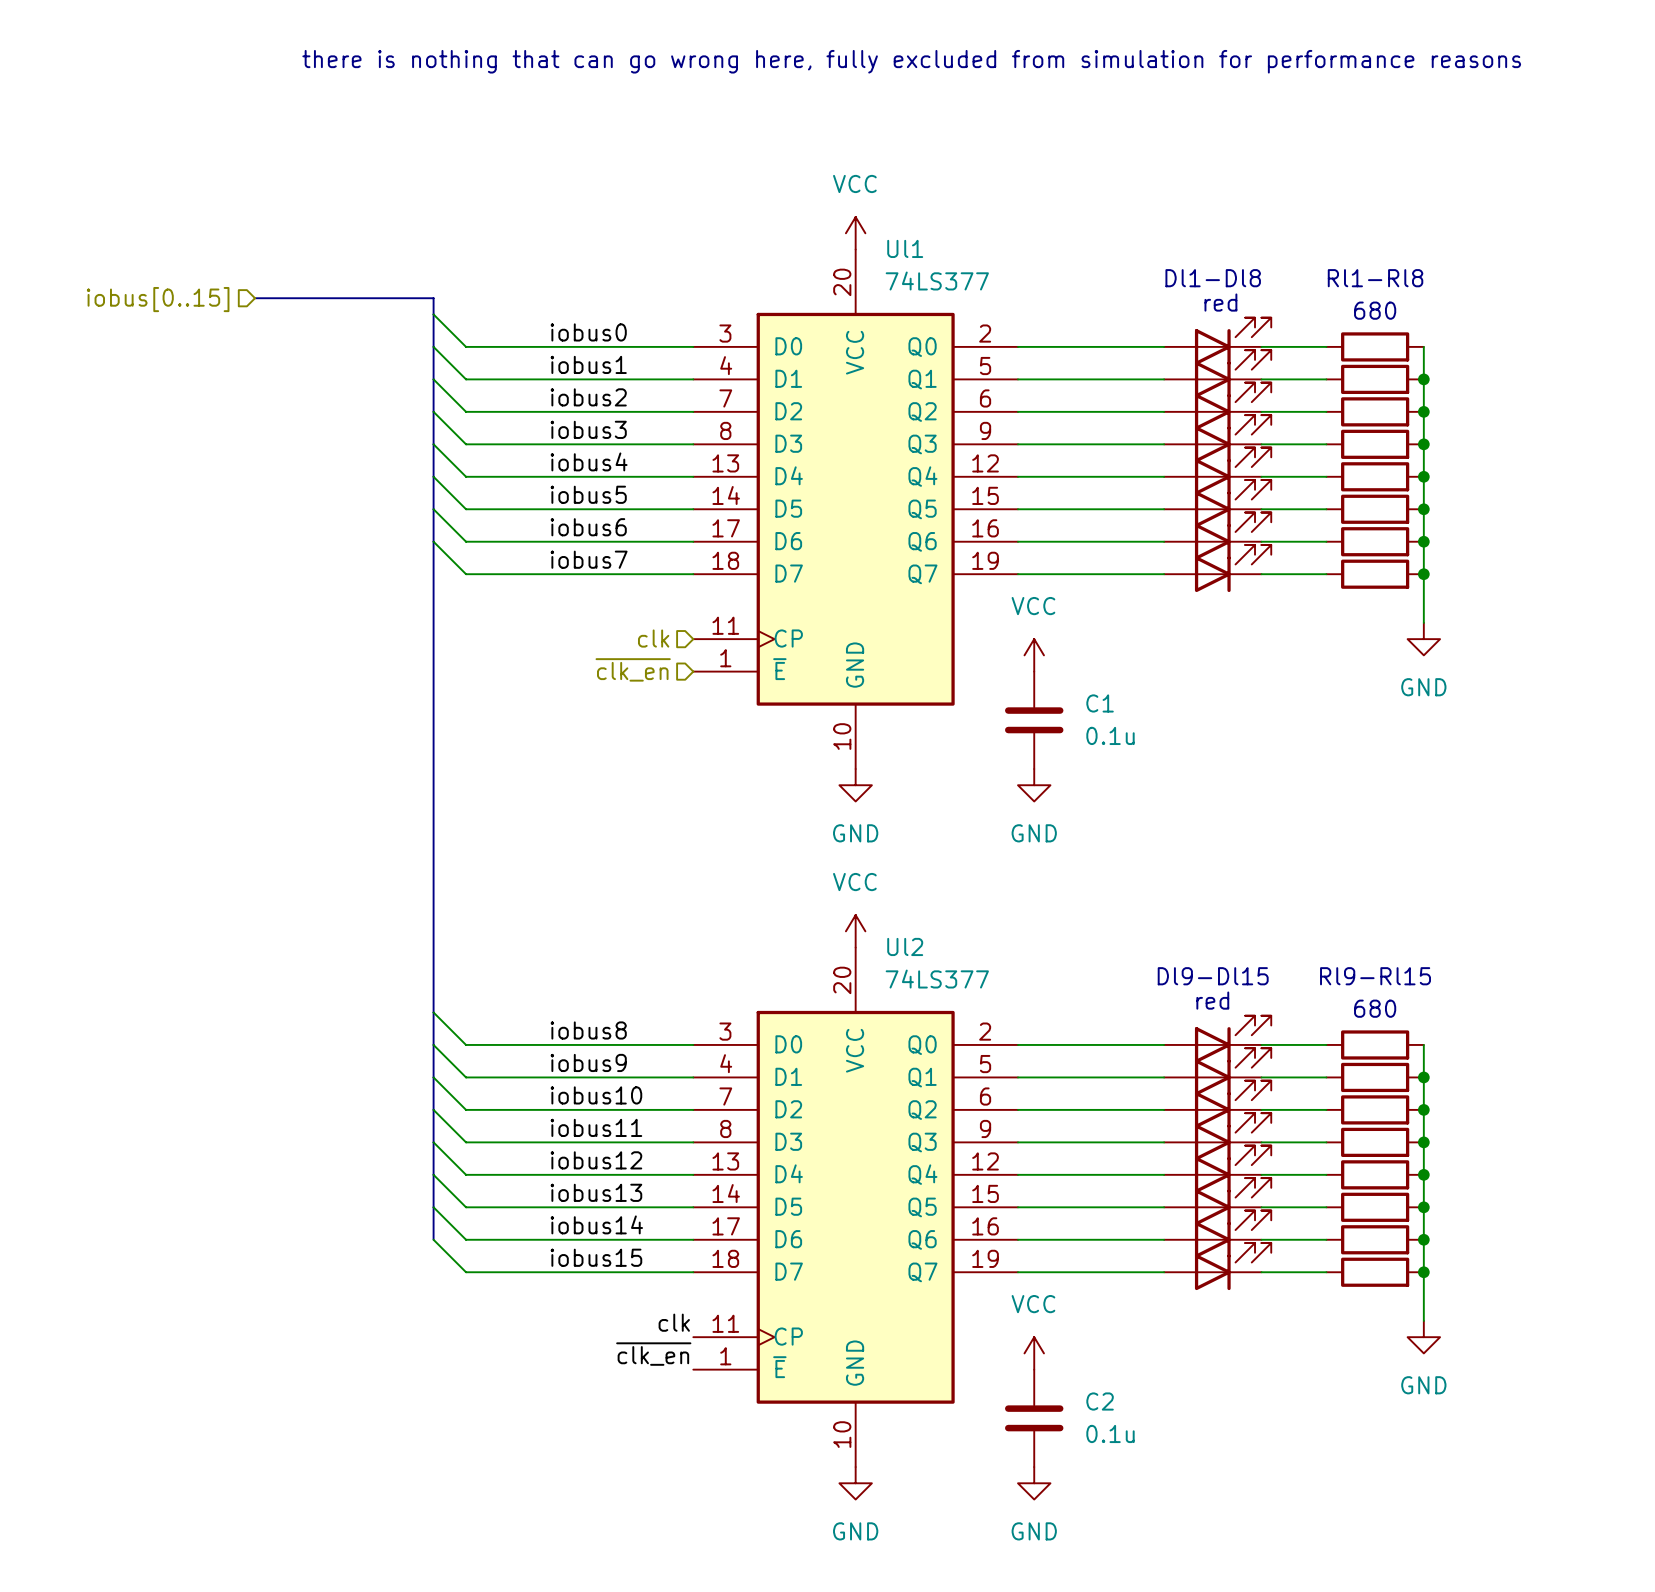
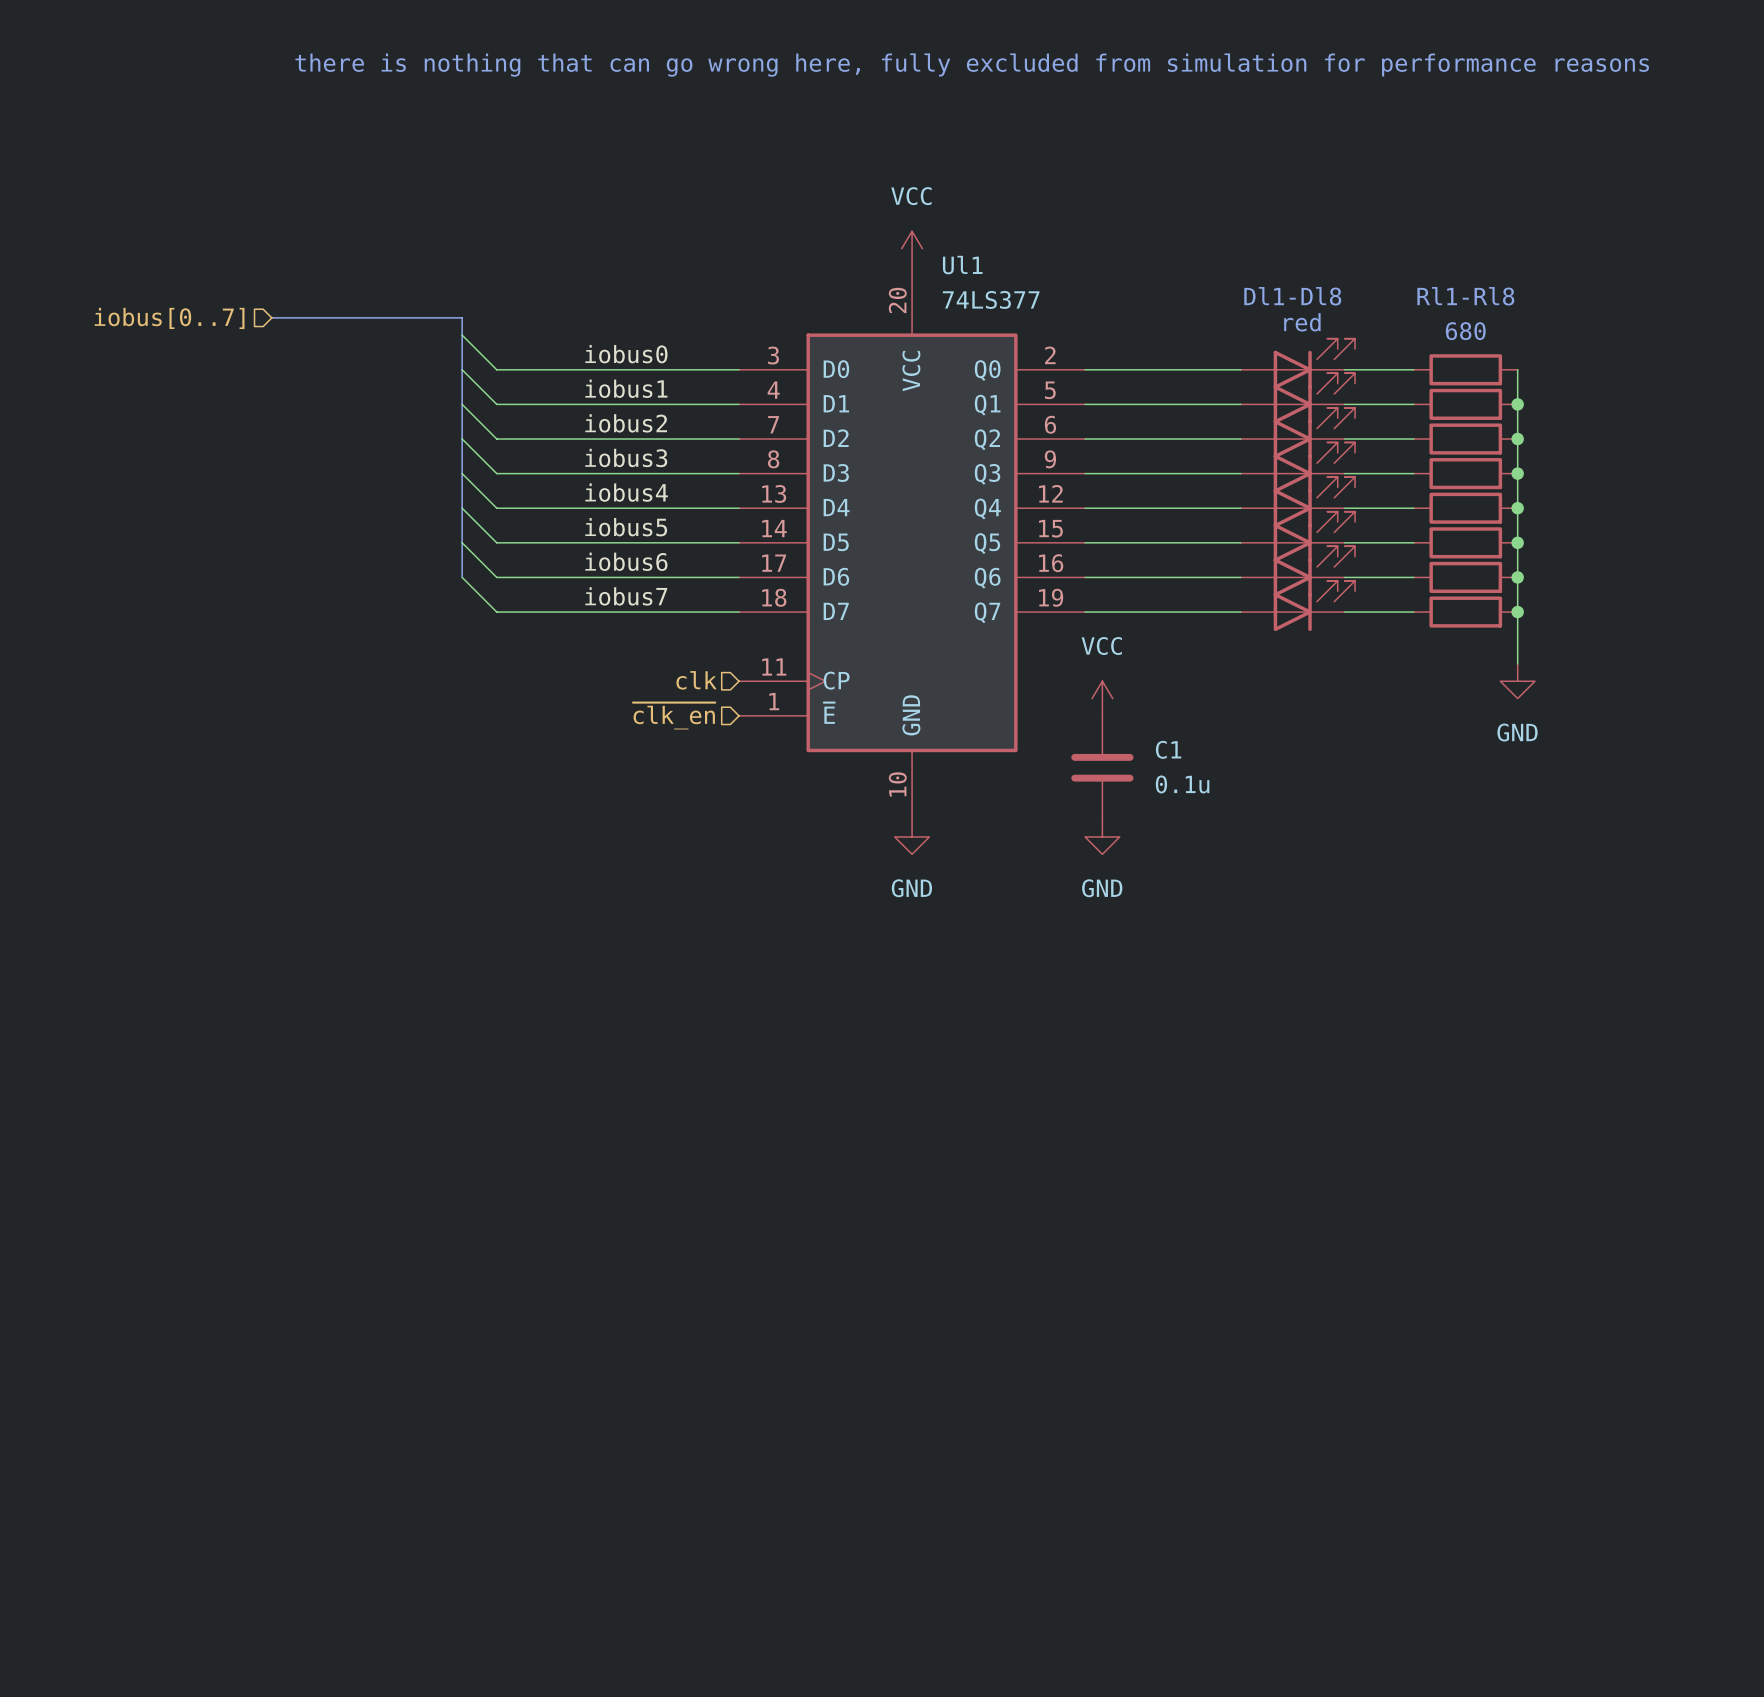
hierarchical label: iobus[0..15] (158, 299) -> iobus[0..7] (169, 318)
bus: (433, 541) (433, 1239) -> none
power symbol: VCC (855, 931) -> none
text: Dl9-Dl15 (1213, 976) -> none
text: Rl9-Rl15 (1375, 976) -> none
text: red (1212, 1000) -> none
text: 680 (1375, 1008) -> none
wire: (433, 1012) (466, 1044) (693, 1044) -> none
label: iobus8 (588, 1030) -> none
part: (1217, 1039) -> none
wire: (433, 1044) (466, 1077) (693, 1077) -> none
wire: (1017, 1044) (1164, 1044) -> none
wire: (1261, 1044) (1326, 1044) -> none
part: (1375, 1044) -> none
wire: (1423, 1044) (1423, 1320) -> none
label: iobus9 (588, 1062) -> none
part: (1217, 1071) -> none
wire: (433, 1077) (466, 1109) (693, 1109) -> none
wire: (1017, 1077) (1164, 1077) -> none
wire: (1261, 1077) (1326, 1077) -> none
part: (1375, 1077) -> none
junction: (1423, 1077) -> none
label: iobus10 (596, 1095) -> none
part: (1217, 1104) -> none
wire: (433, 1109) (466, 1142) (693, 1142) -> none
wire: (1017, 1109) (1164, 1109) -> none
wire: (1261, 1109) (1326, 1109) -> none
part: (1375, 1109) -> none
junction: (1423, 1109) -> none
label: iobus11 (596, 1127) -> none
part: (1217, 1136) -> none
wire: (433, 1142) (466, 1174) (693, 1174) -> none
wire: (1017, 1142) (1164, 1142) -> none
wire: (1261, 1142) (1326, 1142) -> none
part: (1375, 1142) -> none
junction: (1423, 1142) -> none
label: iobus12 (596, 1160) -> none
part: (1217, 1169) -> none
wire: (433, 1174) (466, 1207) (693, 1207) -> none
wire: (1017, 1174) (1164, 1174) -> none
wire: (1261, 1174) (1326, 1174) -> none
part: (1375, 1174) -> none
junction: (1423, 1174) -> none
label: iobus13 (596, 1192) -> none
part: (1217, 1201) -> none
wire: (433, 1207) (466, 1239) (693, 1239) -> none
Ul2: 74LS377 (855, 1207) -> none
wire: (1017, 1207) (1164, 1207) -> none
wire: (1261, 1207) (1326, 1207) -> none
part: (1375, 1207) -> none
junction: (1423, 1207) -> none
label: iobus14 (596, 1224) -> none
part: (1217, 1234) -> none
wire: (433, 1239) (466, 1272) (693, 1272) -> none
wire: (1017, 1239) (1164, 1239) -> none
wire: (1261, 1239) (1326, 1239) -> none
part: (1375, 1239) -> none
junction: (1423, 1239) -> none
label: iobus15 (596, 1257) -> none
part: (1217, 1266) -> none
wire: (1017, 1272) (1164, 1272) -> none
wire: (1261, 1272) (1326, 1272) -> none
part: (1375, 1272) -> none
junction: (1423, 1272) -> none
label: clk (674, 1322) -> none
power symbol: GND (1423, 1337) -> none
power symbol: VCC (1034, 1353) -> none
label: ~{clk_en} (653, 1354) -> none
C2: 0.1u (1034, 1418) -> none
power symbol: GND (855, 1483) -> none
power symbol: GND (1034, 1483) -> none

